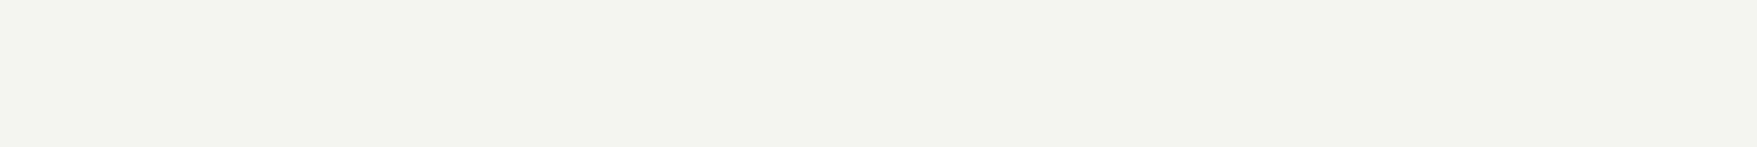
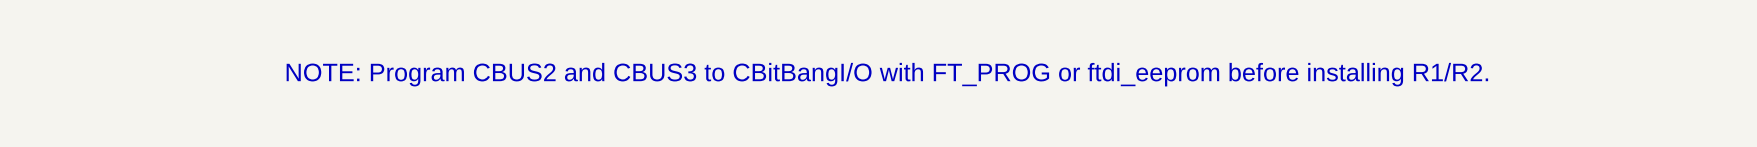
text: none -> NOTE: Program CBUS2 and CBUS3 to CBitBangI/O with FT_PROG or ftdi_eeprom before installing R1/R2. (887, 74)

